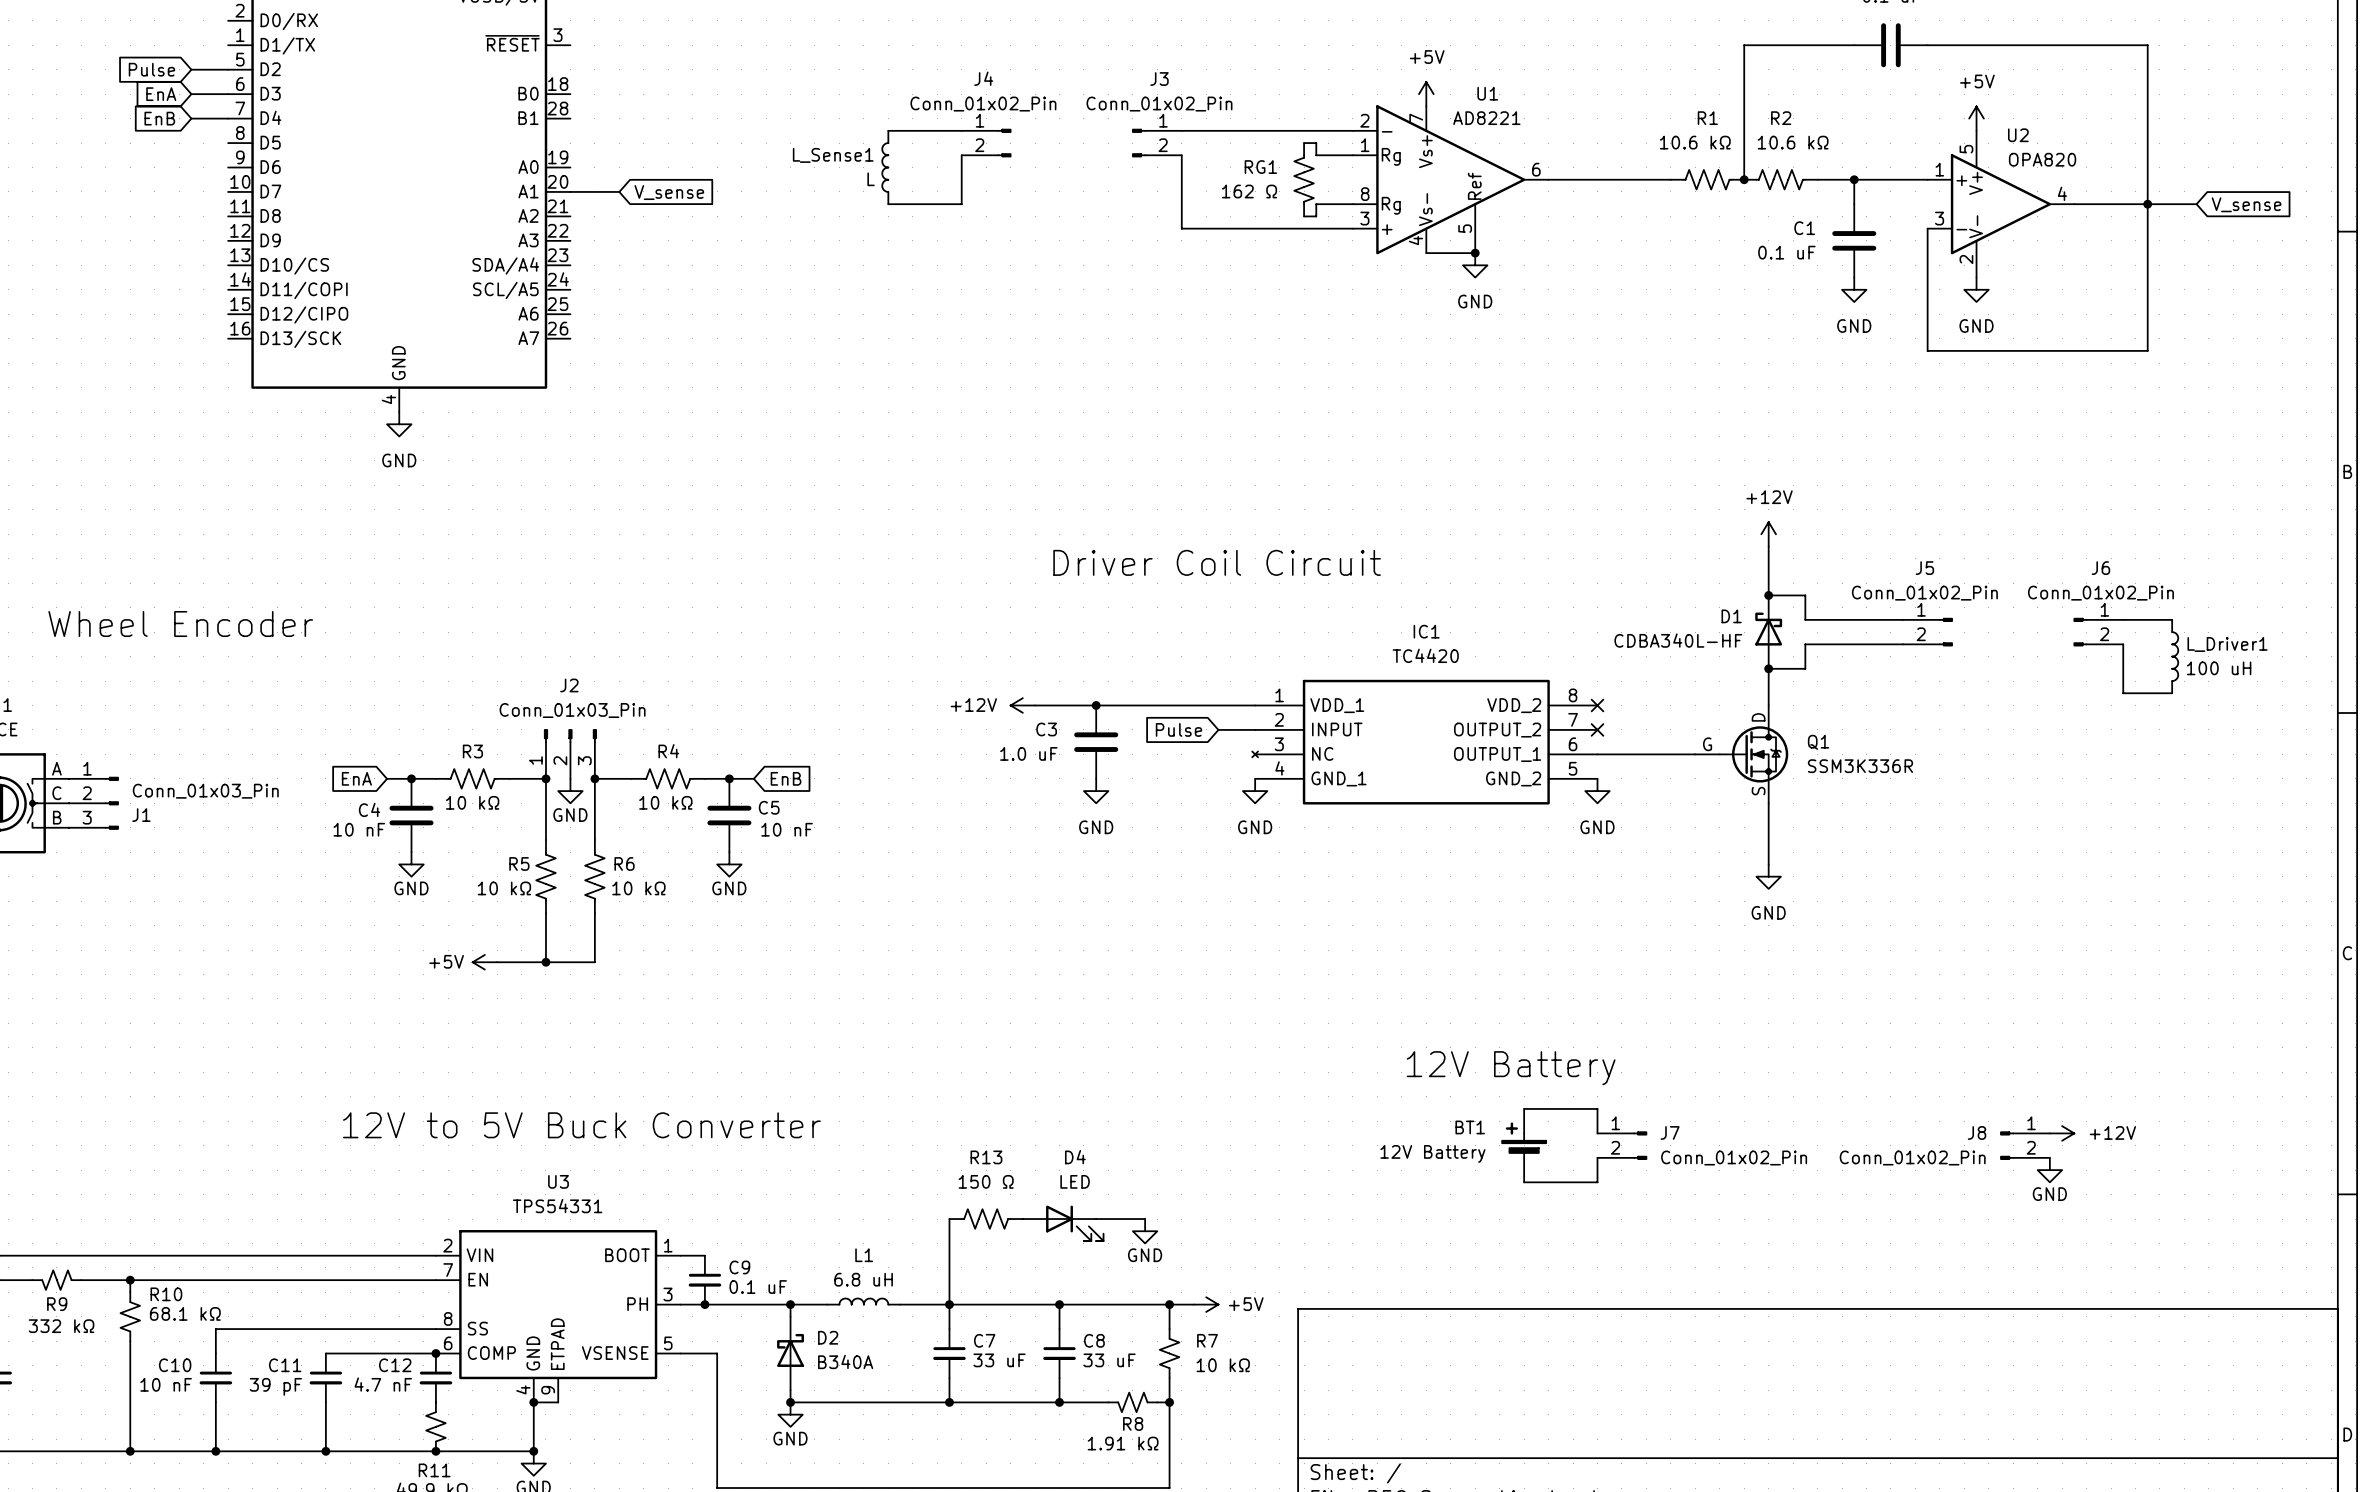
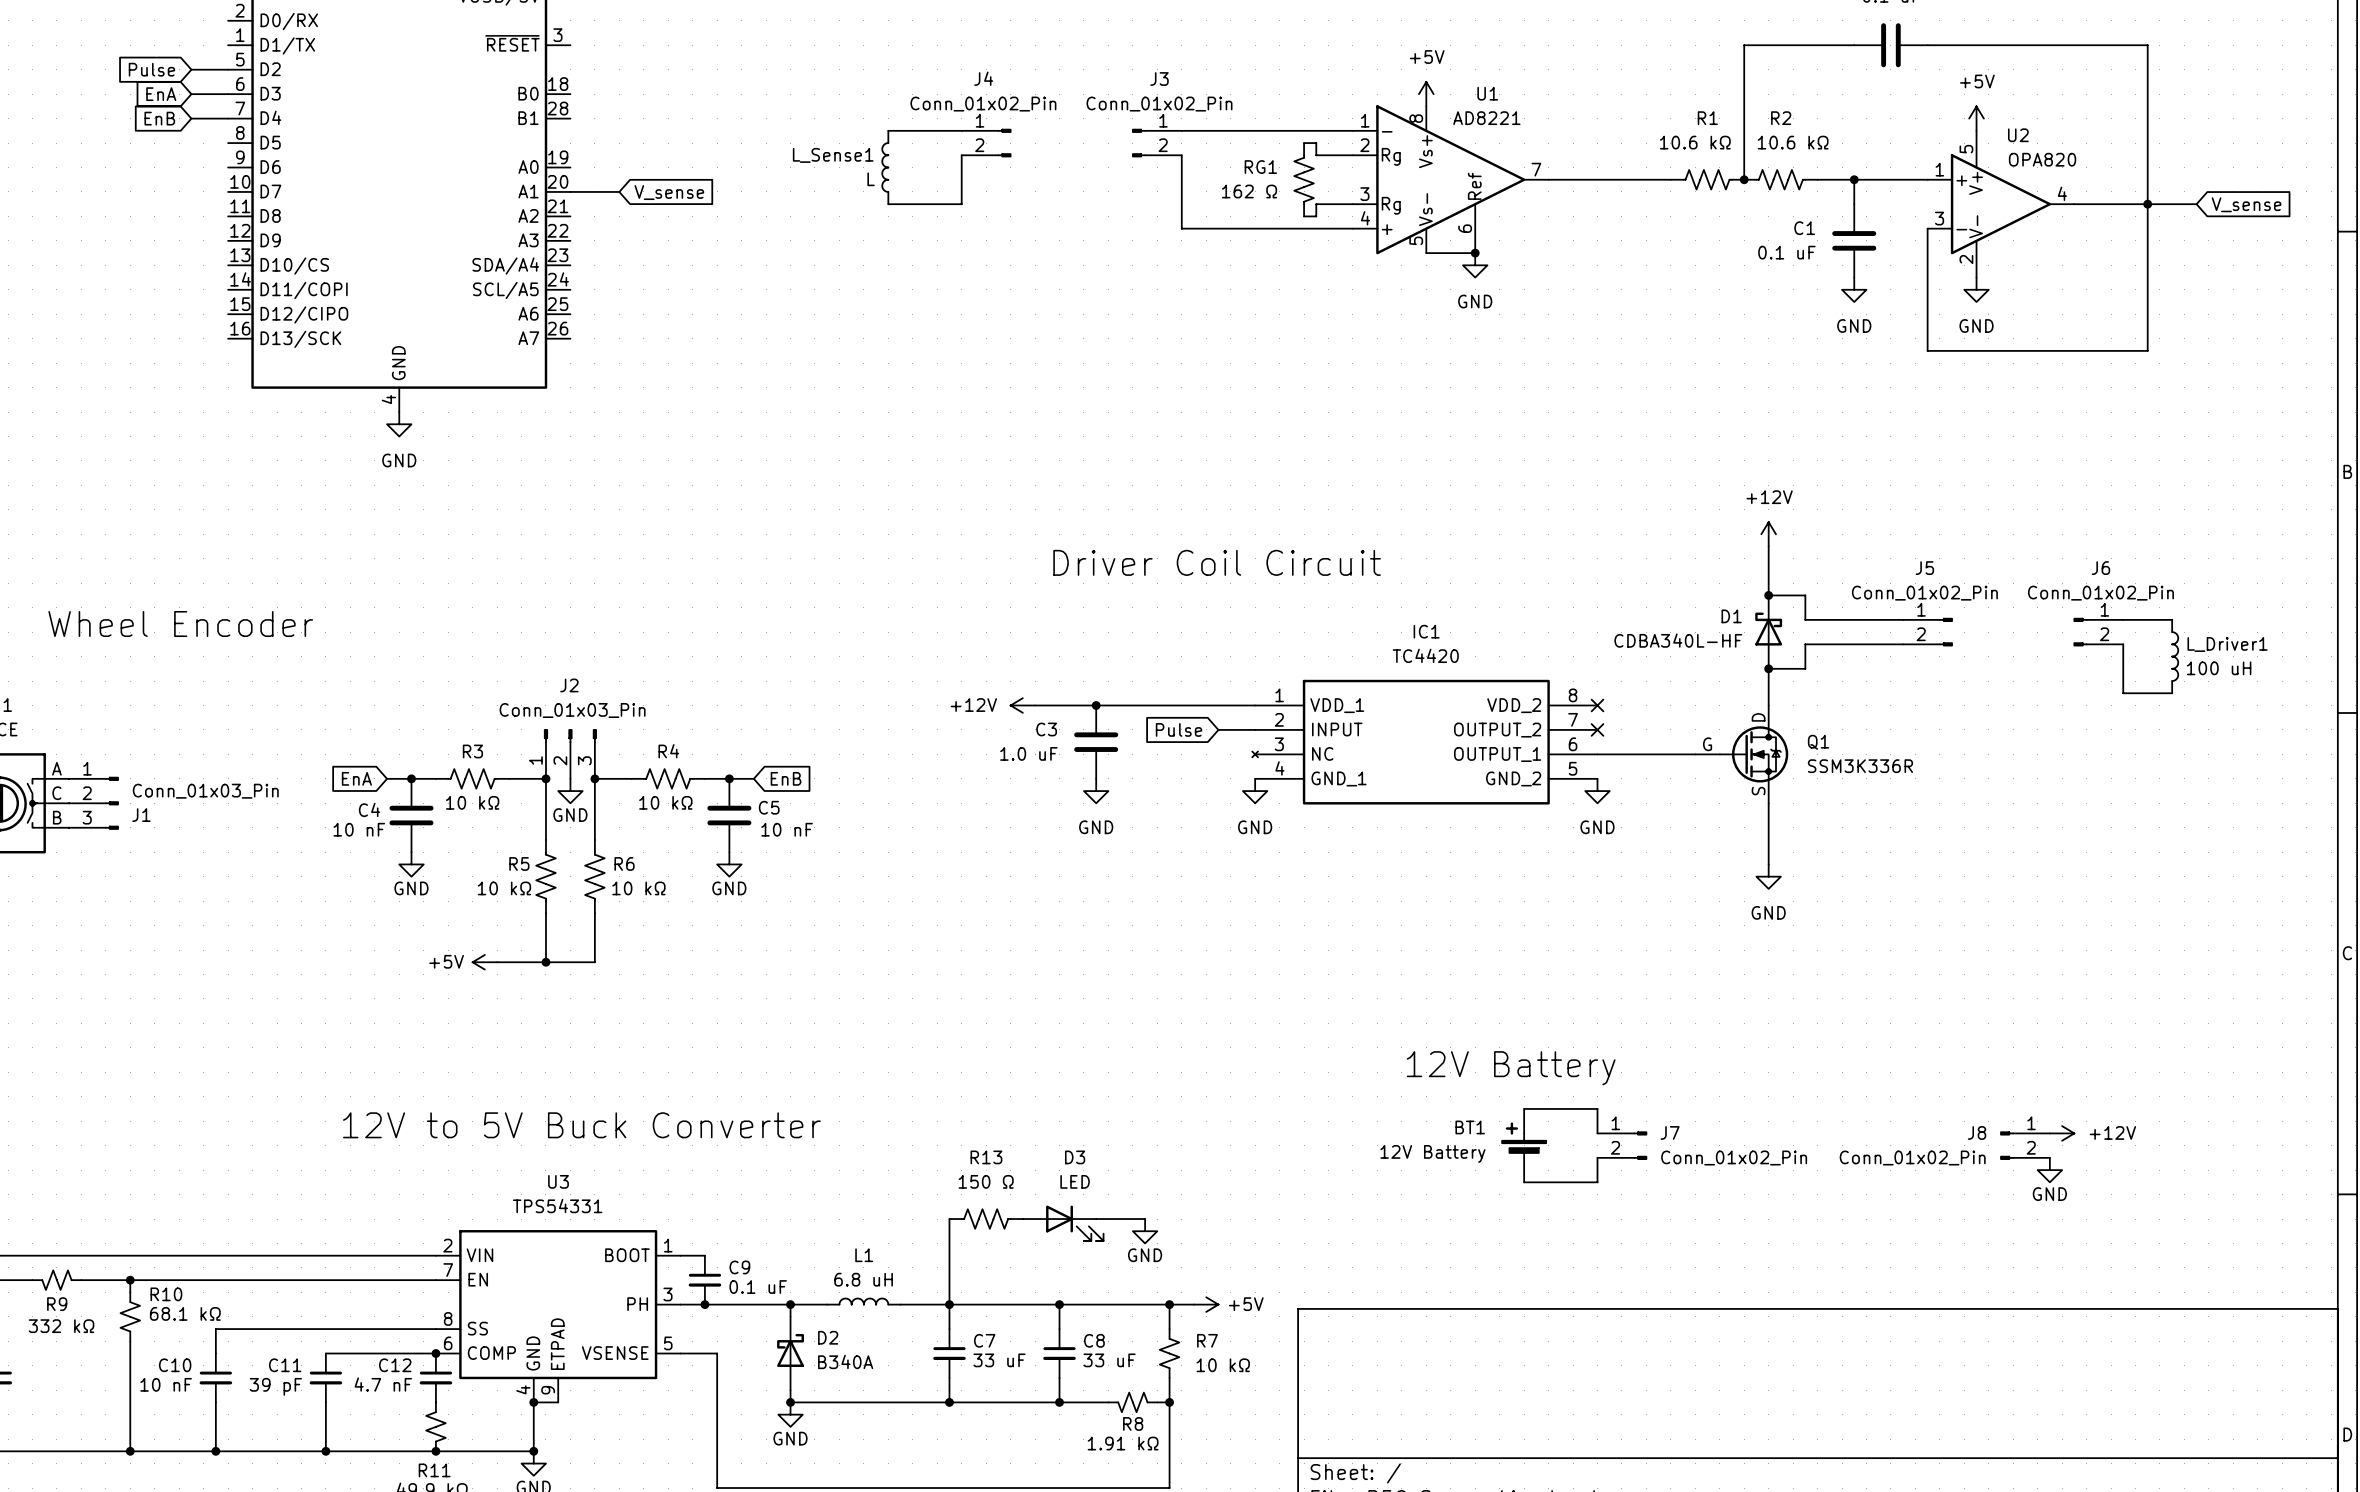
U1 pin number: 7 (1416, 118) -> 8 (1416, 118)
U1 pin number: 2 (1364, 120) -> 1 (1365, 120)
U1 pin number: 1 (1365, 145) -> 2 (1364, 145)
U1 pin number: 6 (1536, 169) -> 7 (1536, 169)
U1 pin number: 8 (1365, 194) -> 3 (1364, 194)
U1 pin number: 3 (1364, 218) -> 4 (1365, 218)
U1 pin number: 5 (1465, 228) -> 6 (1465, 228)
U1 pin number: 4 (1415, 240) -> 5 (1416, 240)
D4 name: D4 (1075, 1157) -> D3 (1075, 1157)

